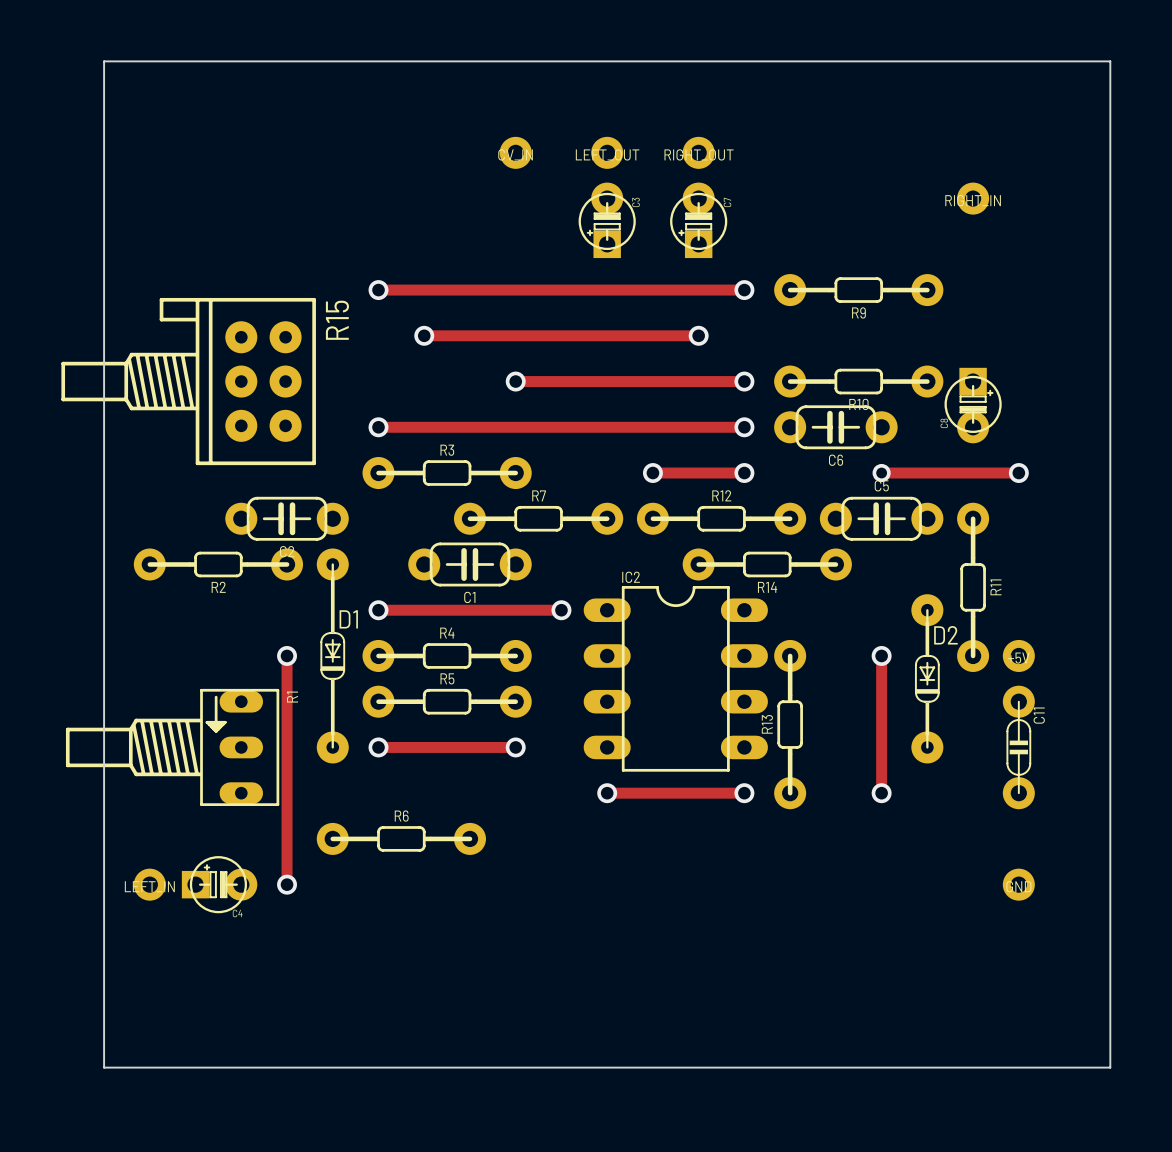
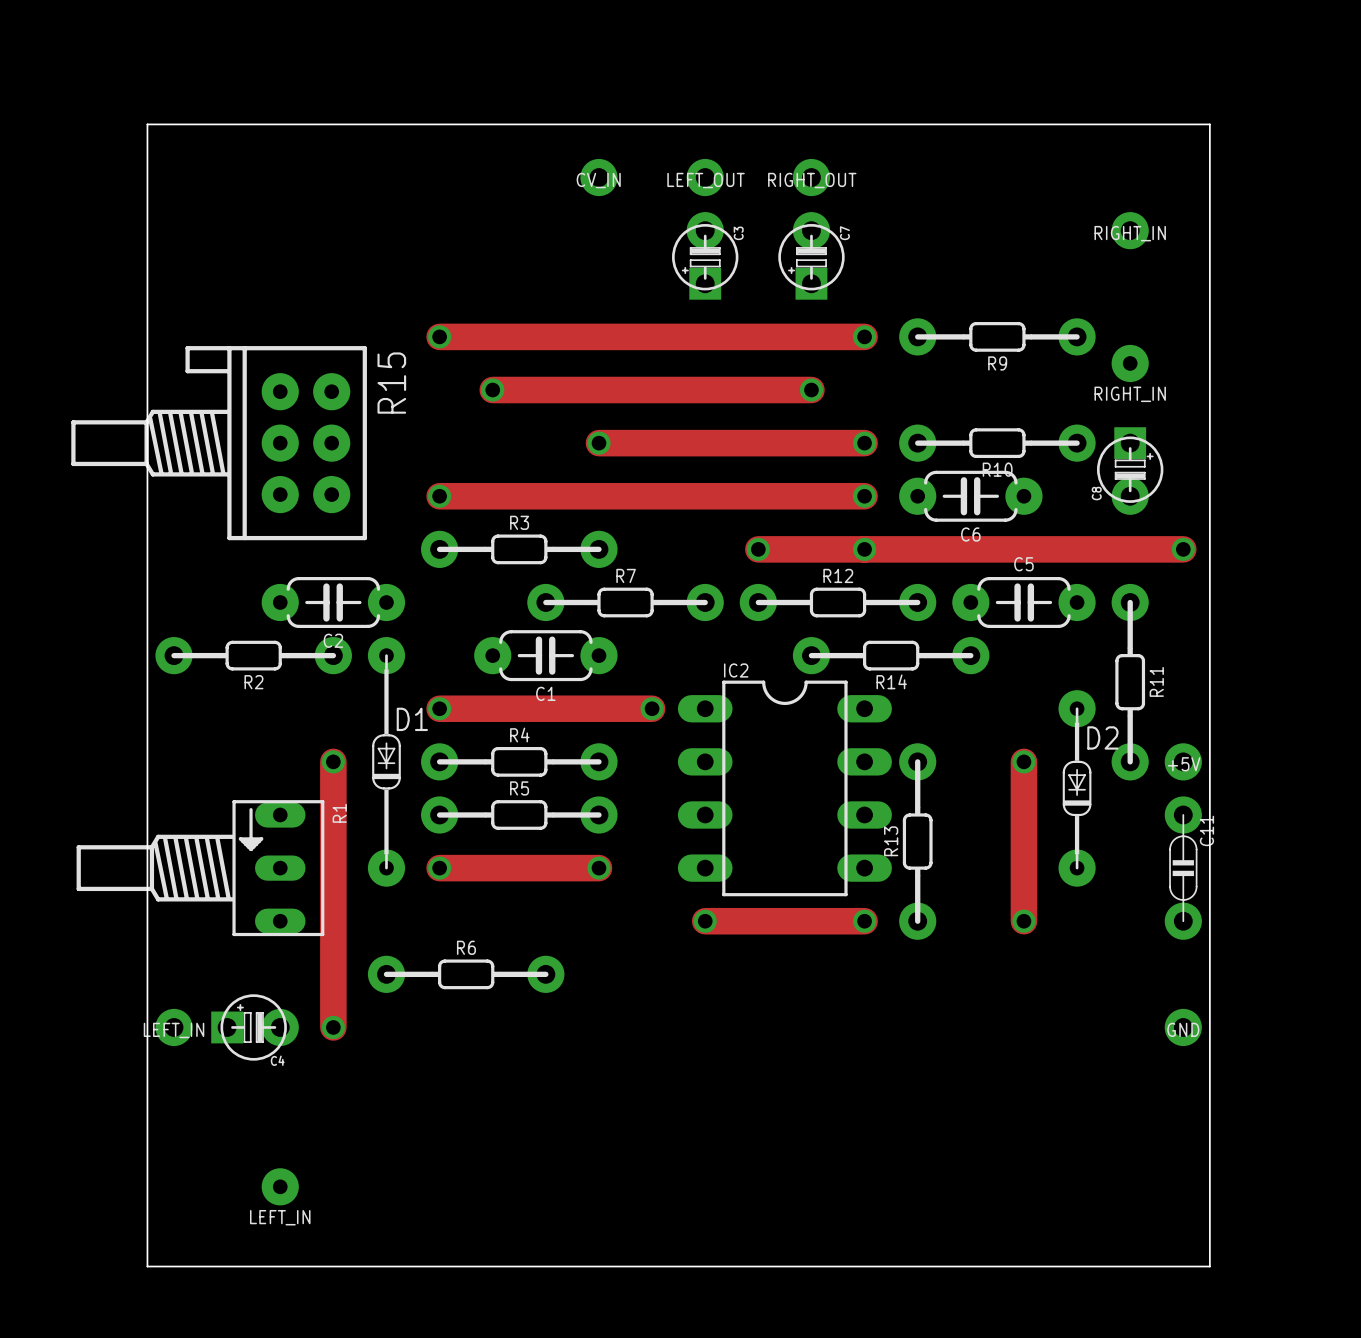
board edge: (104, 61) (1110, 61) (1110, 1067) (104, 1067) (104, 61) -> (147, 124) (147, 1266) (1209, 1266) (1209, 124) (147, 124)
track width: thin (378, 290) (744, 290) -> thick (439, 336) (864, 336)
RIGHT_IN: none -> (1130, 363)
track width: thin (424, 335) (698, 335) -> thick (492, 390) (811, 390)
track width: thin (515, 381) (744, 381) -> thick (598, 443) (864, 443)
C6 footprint: [774, 405, 898, 450] -> [899, 470, 1043, 522]
track width: thin (378, 427) (744, 427) -> thick (439, 496) (864, 496)
track width: thin (652, 473) (744, 473) -> thick (758, 549) (864, 549)
track: none -> (864, 549) (1023, 549)
track width: thin (881, 473) (1018, 473) -> thick (1023, 549) (1183, 549)
via: (881, 473) -> none
C2 footprint: [225, 496, 349, 541] -> [261, 577, 406, 629]
C5 footprint: [819, 496, 944, 541] -> [952, 577, 1096, 629]
C1 footprint: [408, 542, 532, 587] -> [474, 630, 618, 682]
track width: thin (378, 610) (561, 610) -> thick (439, 708) (652, 708)
track width: thin (287, 655) (287, 884) -> thick (333, 761) (333, 1027)
track width: thin (881, 655) (881, 793) -> thick (1023, 761) (1023, 921)
track width: thin (378, 747) (515, 747) -> thick (439, 868) (598, 868)
track width: thin (607, 793) (744, 793) -> thick (705, 921) (864, 921)
LEFT_IN: none -> (280, 1186)

